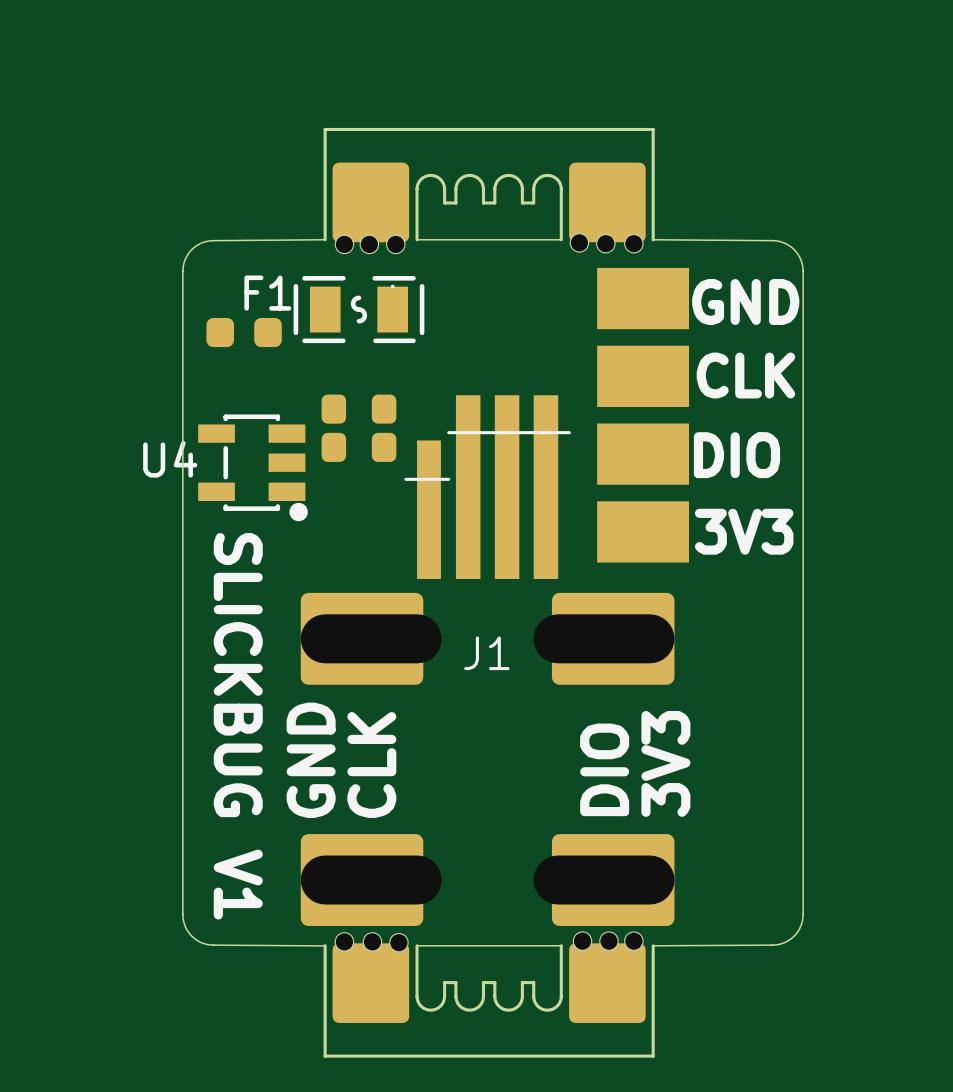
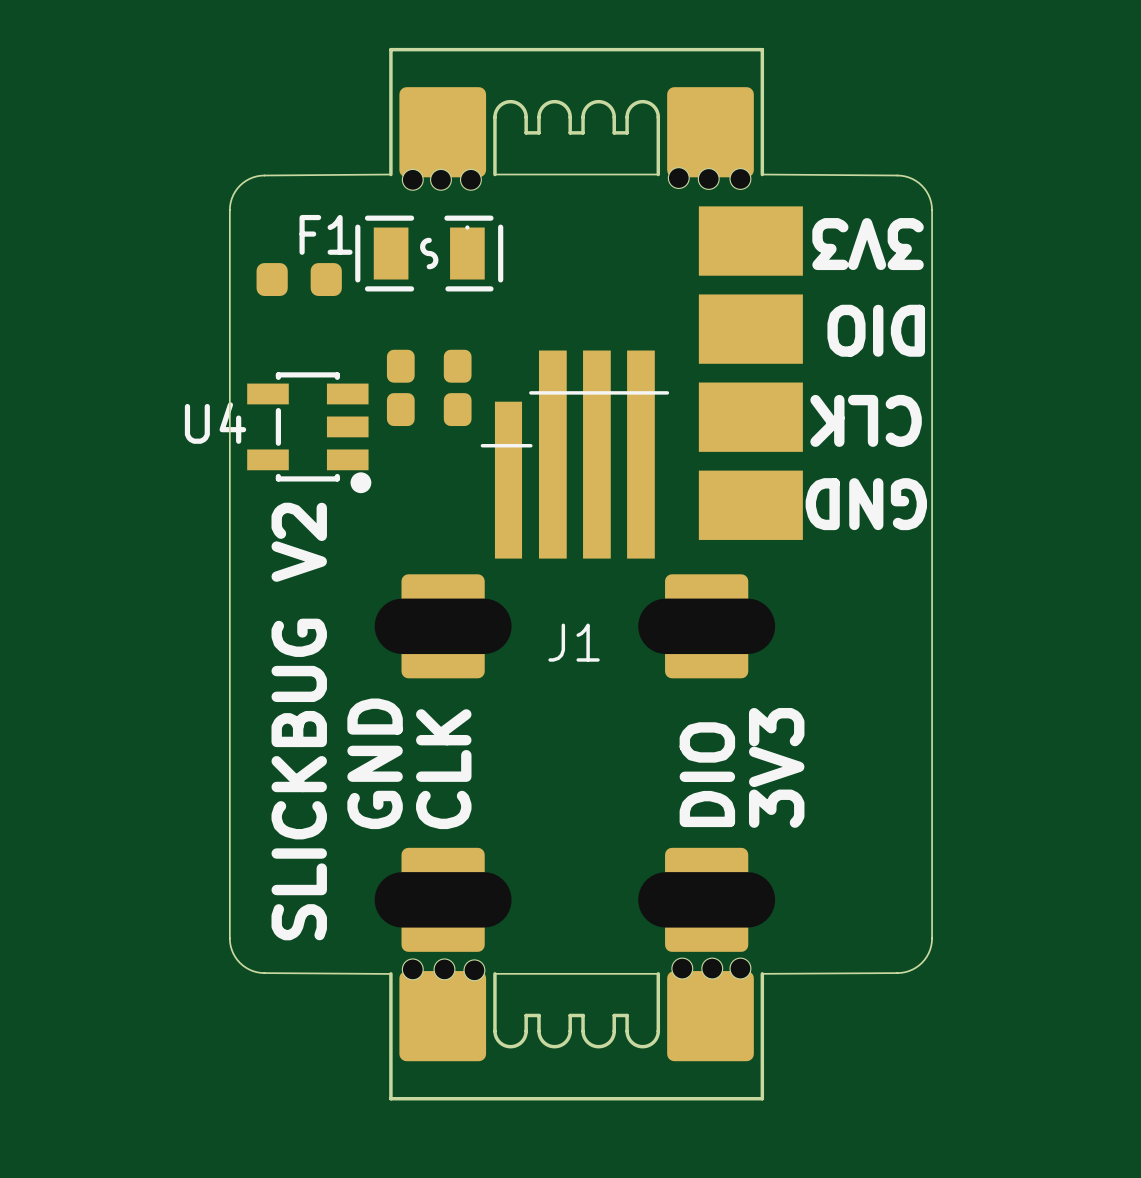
text rotation: 0° (745, 301) -> 180° (866, 504)
text position: GND (745, 301) -> GND (866, 504)
text rotation: 0° (745, 375) -> 180° (866, 420)
J1 footprint: [300, 395, 675, 926] -> [374, 350, 776, 952]
text rotation: 0° (736, 455) -> 180° (876, 330)
text rotation: 0° (744, 531) -> 180° (868, 244)
text position: 3V3 (744, 531) -> 3V3 (868, 244)
text: SLICKBUG V1 (238, 726) -> SLICKBUG V2 (299, 721)

